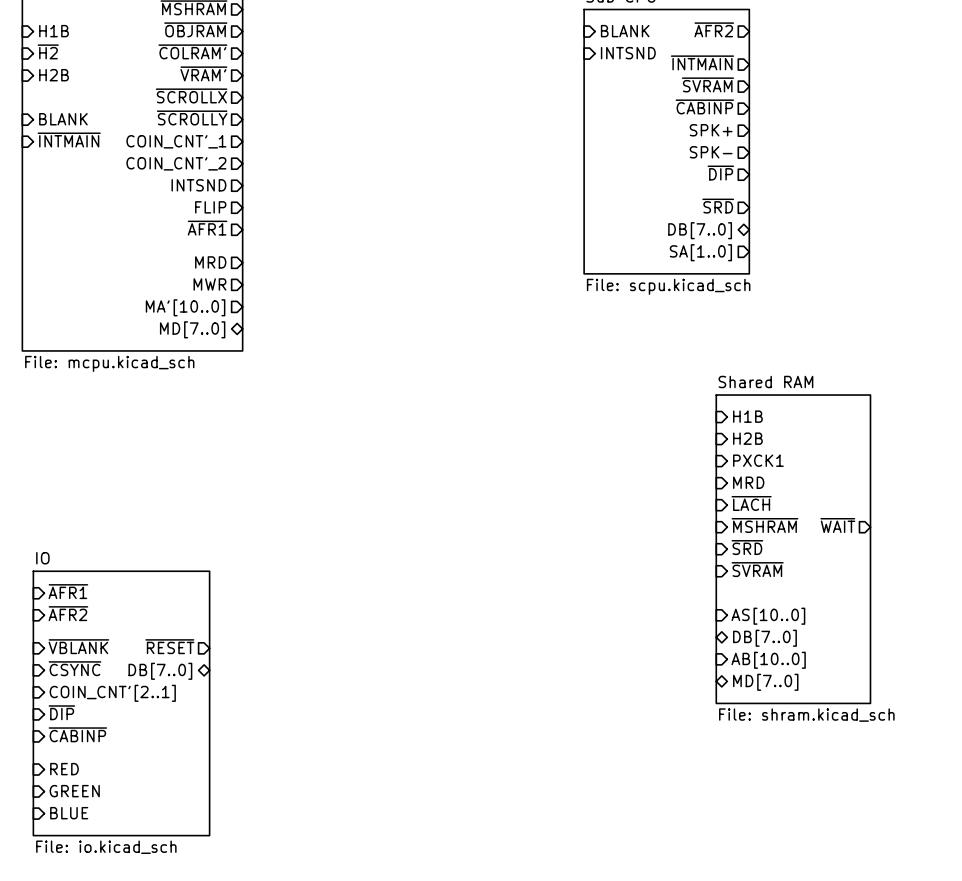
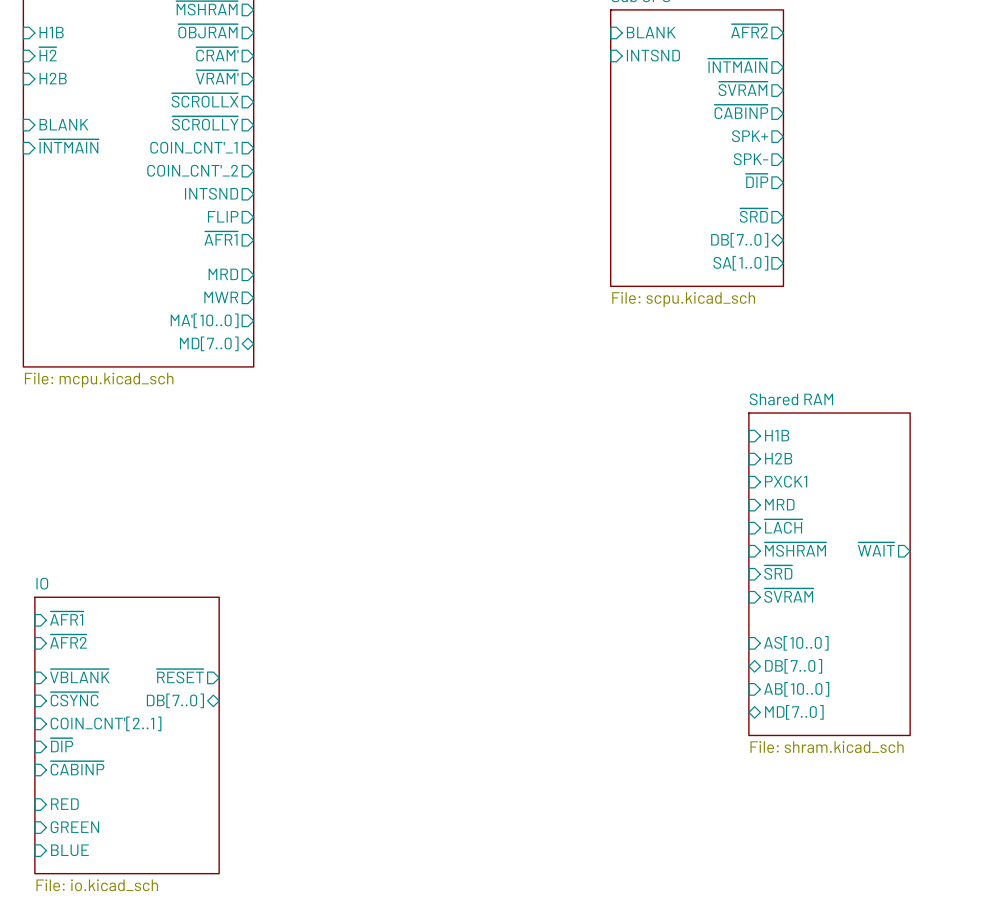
sheet pin: ~{COLRAM'} (192, 51) -> ~{CRAM'} (217, 54)

